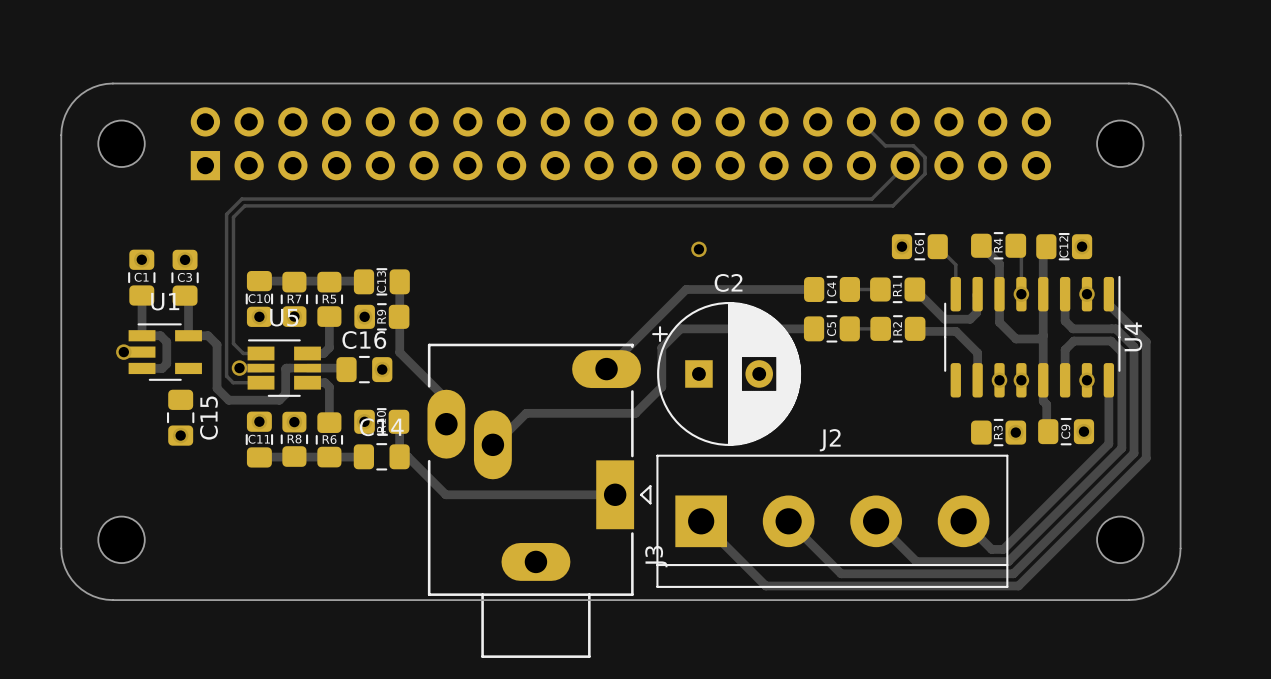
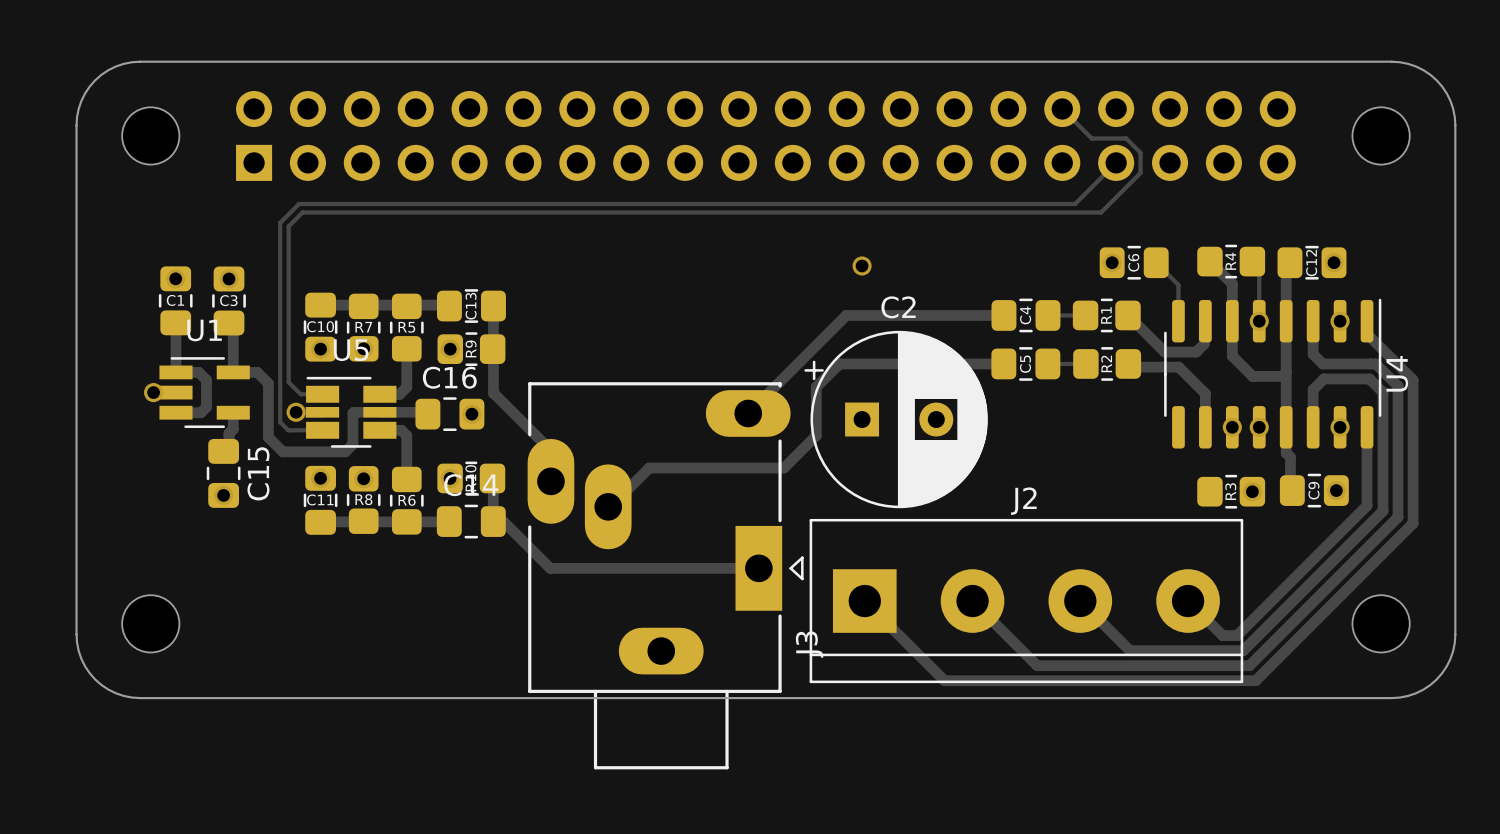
track: none -> (233, 412) (233, 429) (229, 433) (229, 451)

